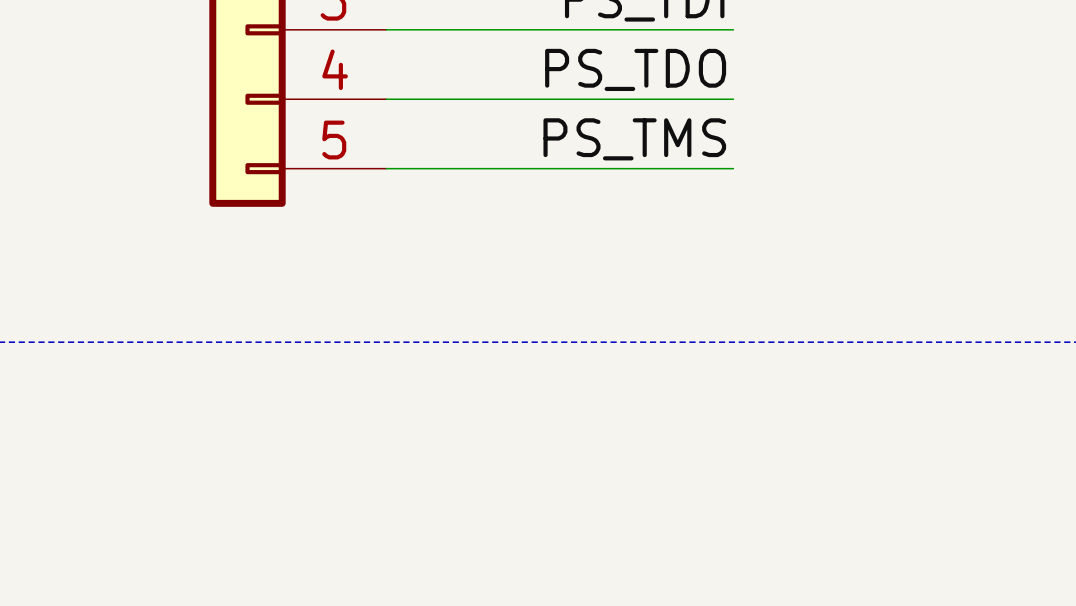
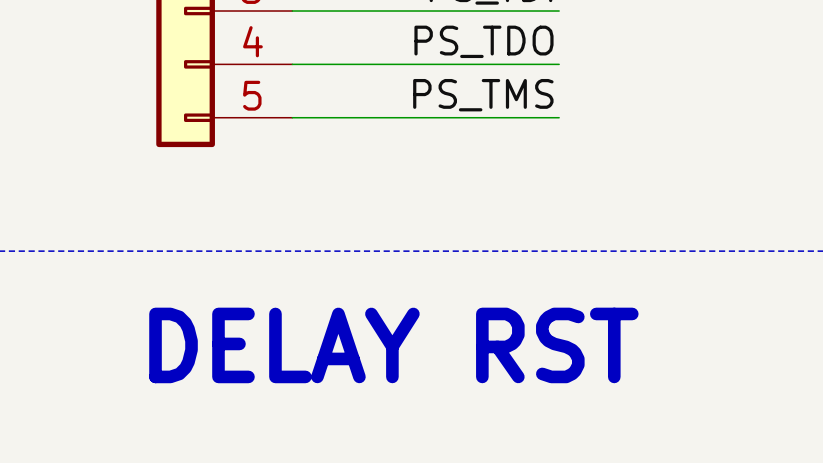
text: none -> DELAY RST (393, 345)

